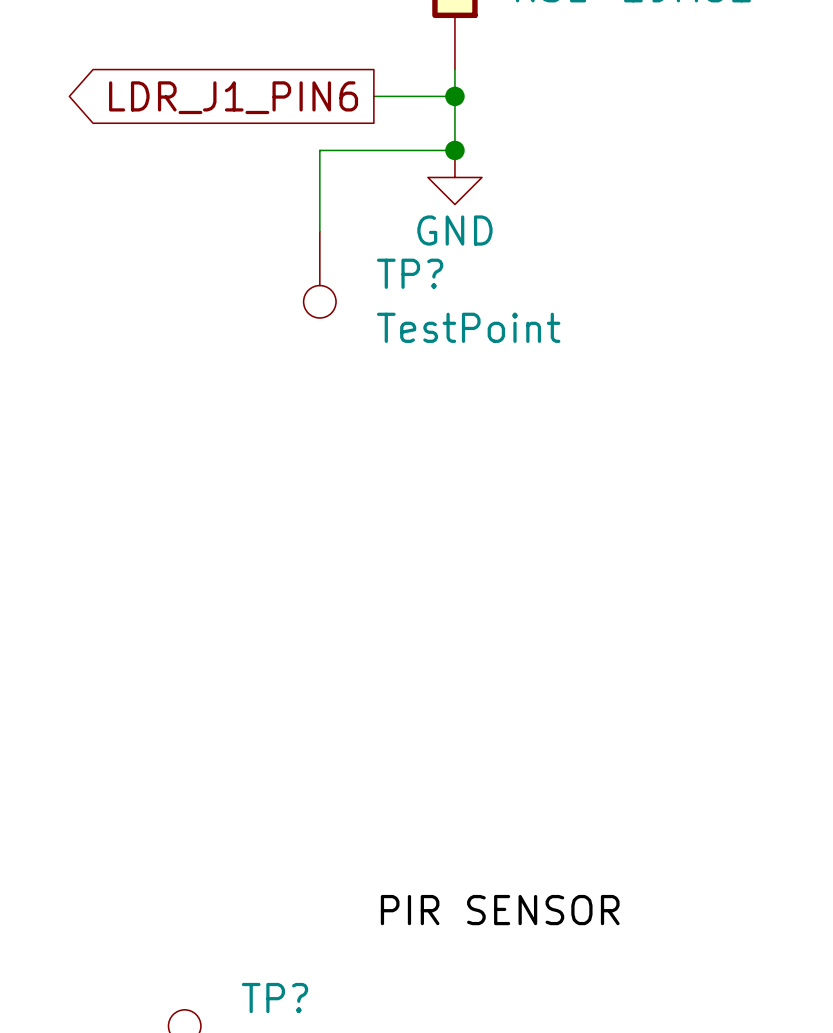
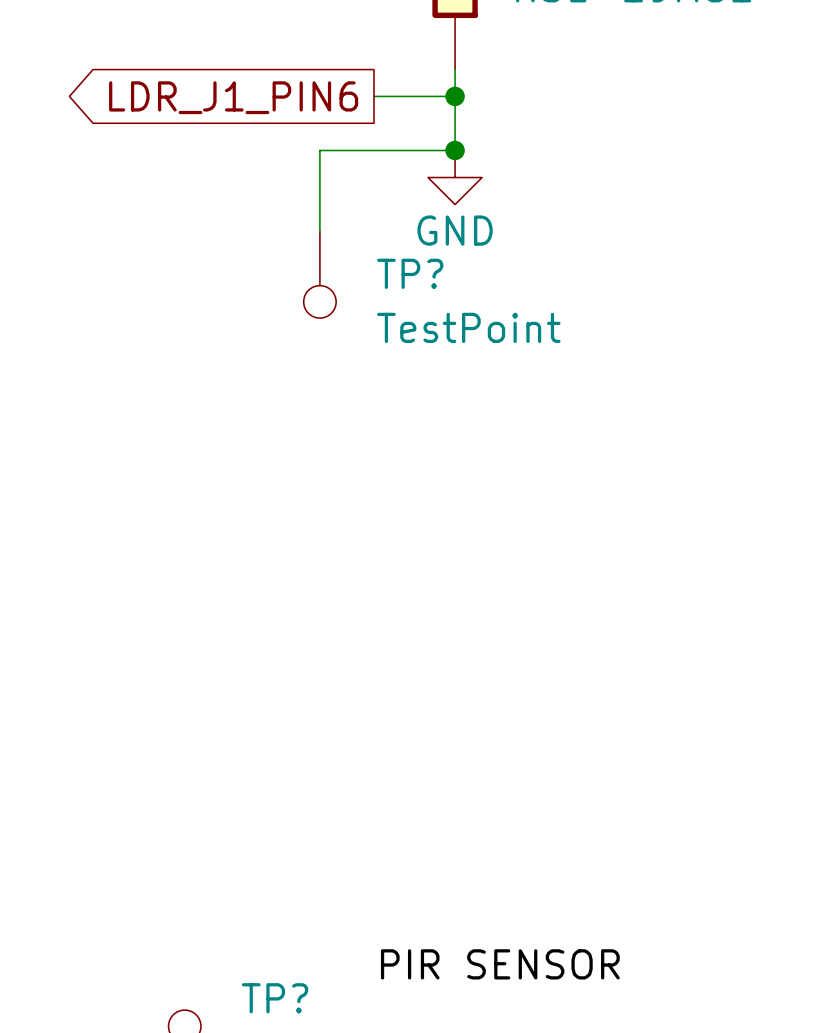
label position: PIR SENSOR (500, 910) -> PIR SENSOR (500, 964)

